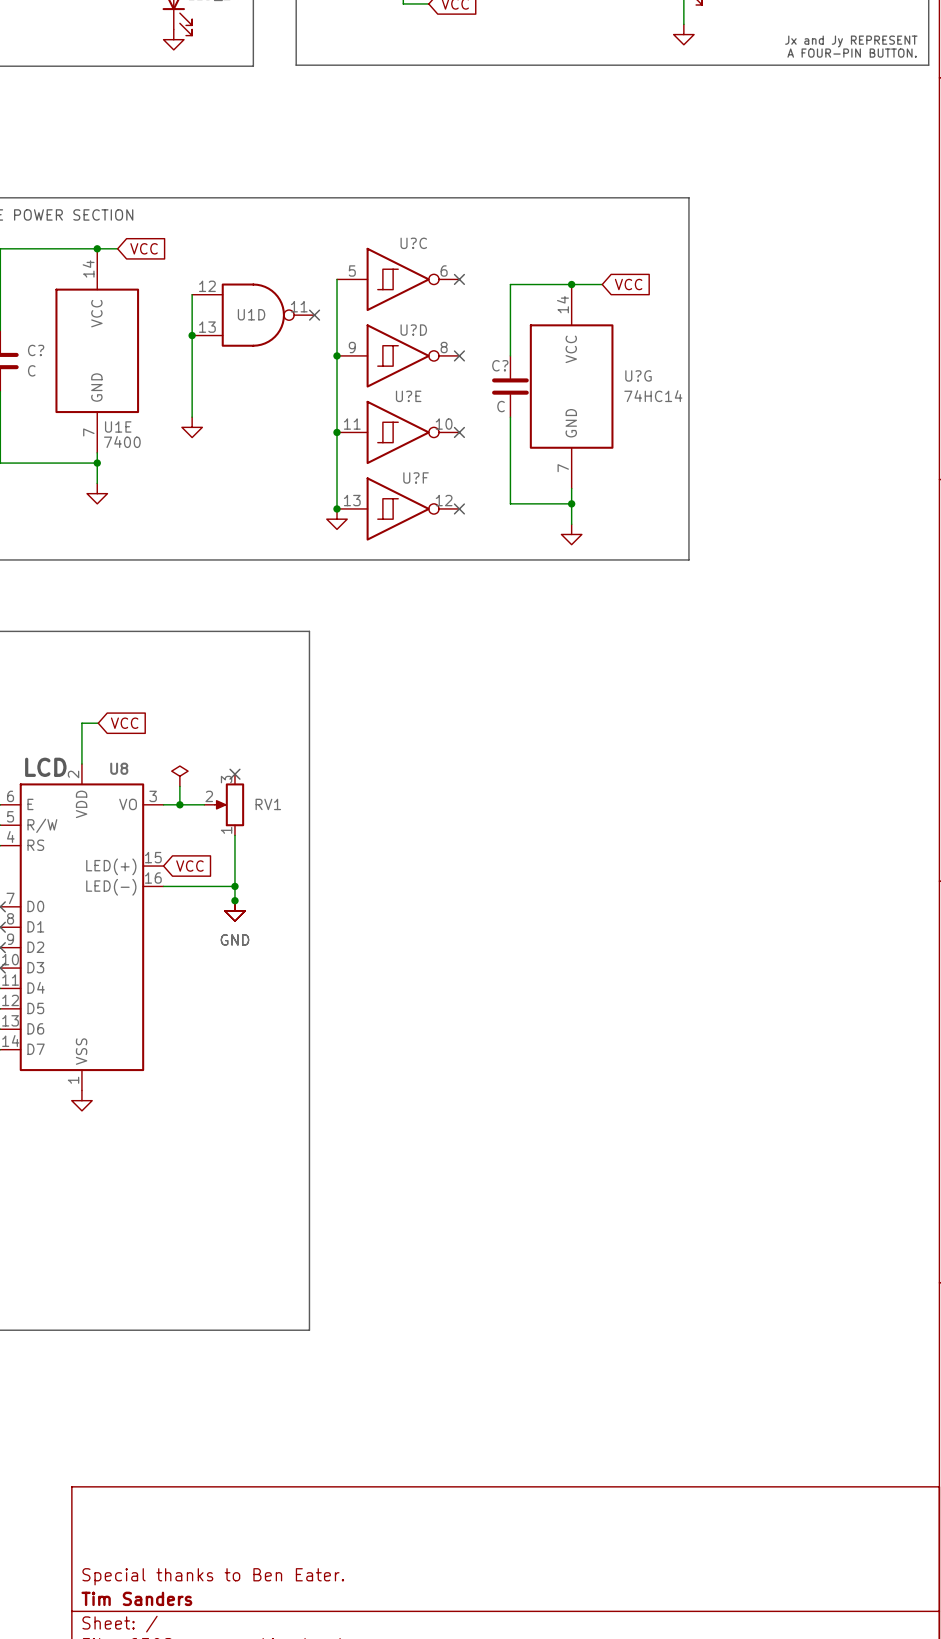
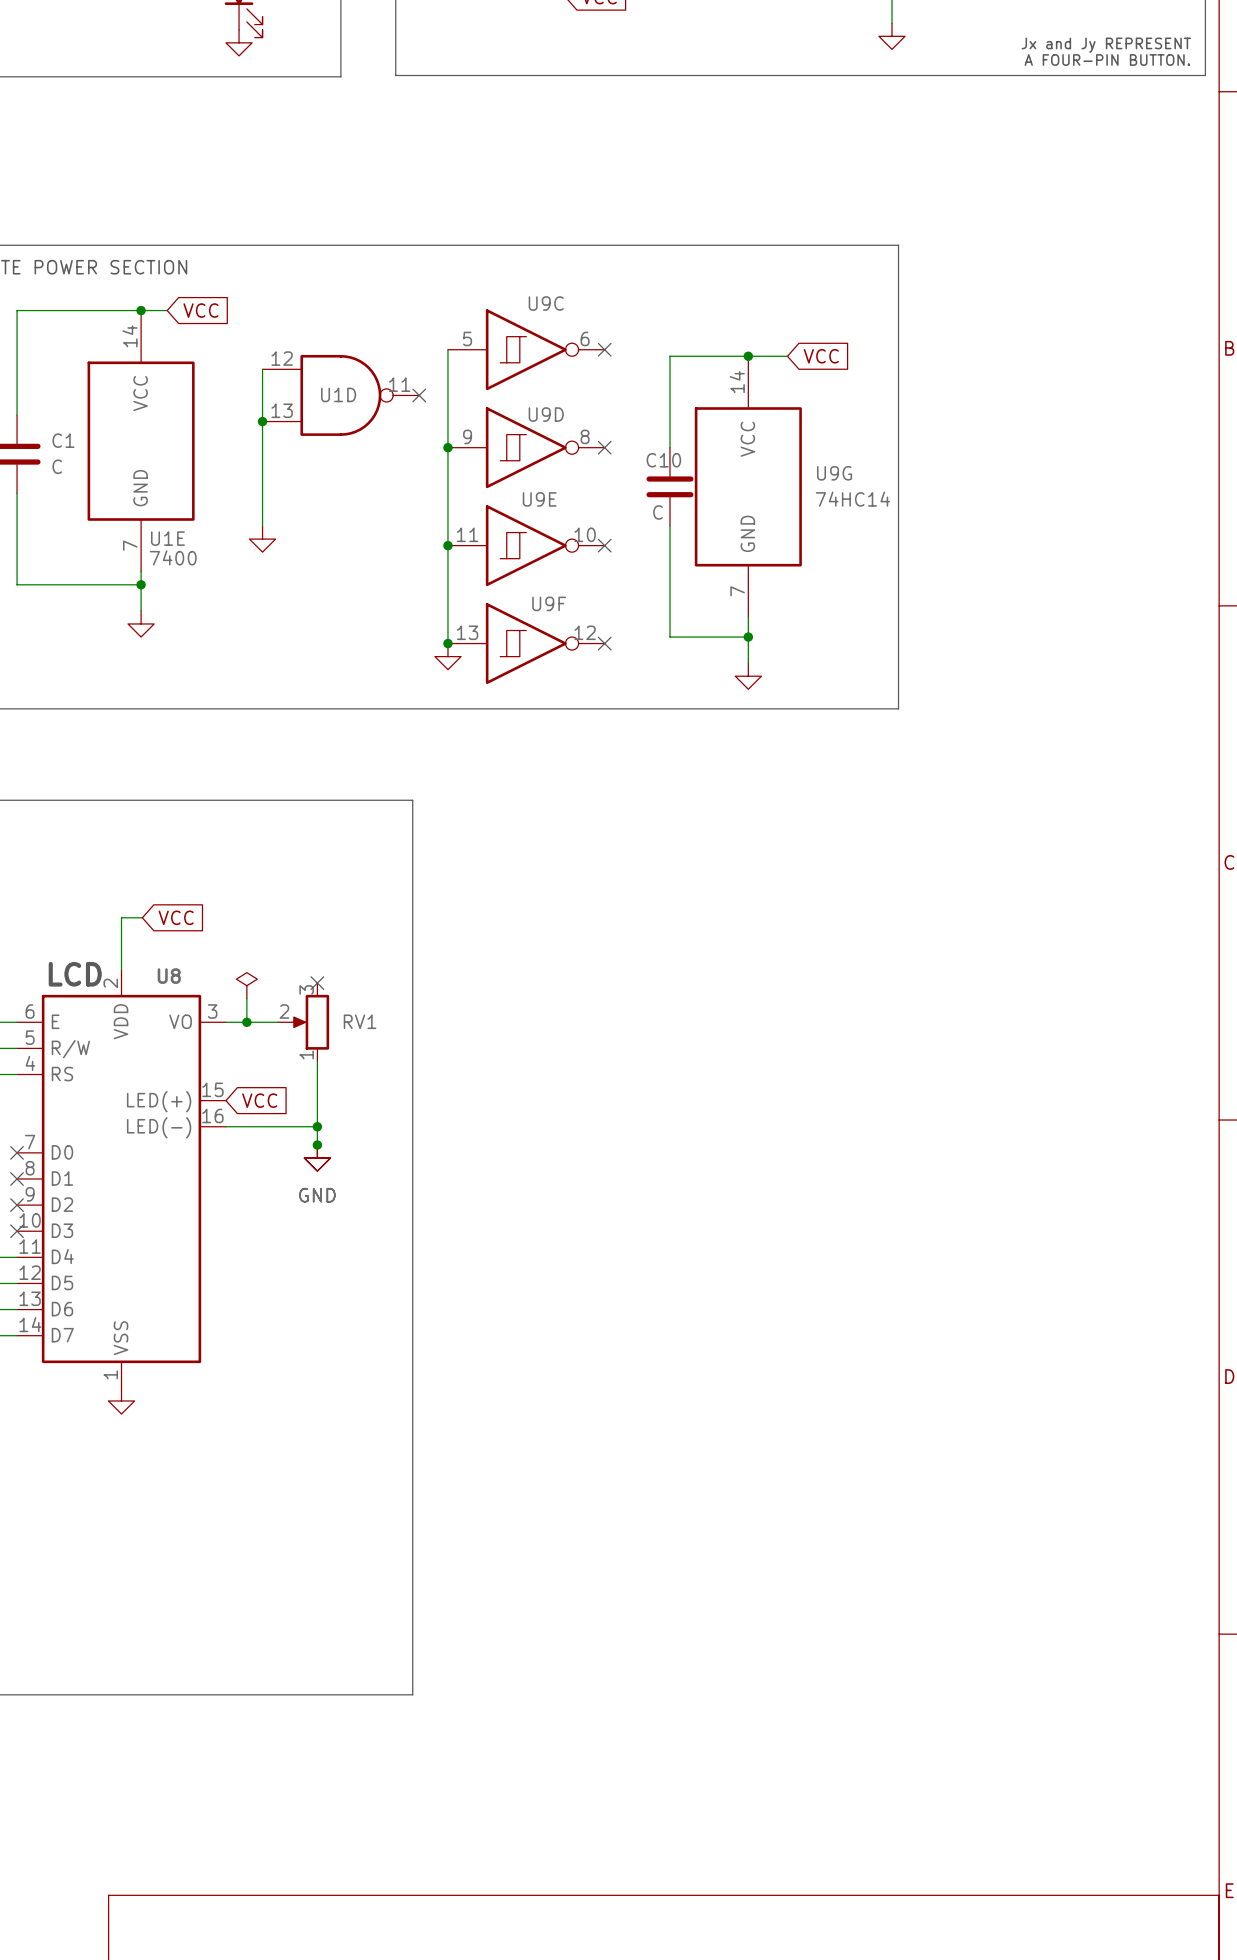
U?C name: U?C (413, 243) -> U9C (546, 303)
U?D name: U?D (413, 330) -> U9D (546, 414)
C? name: C? (36, 350) -> C1 (63, 440)
C? name: C? (500, 365) -> C10 (663, 460)
U?G name: U?G (638, 375) -> U9G (834, 473)
U?E name: U?E (408, 396) -> U9E (539, 499)
U?F name: U?F (416, 477) -> U9F (549, 603)

